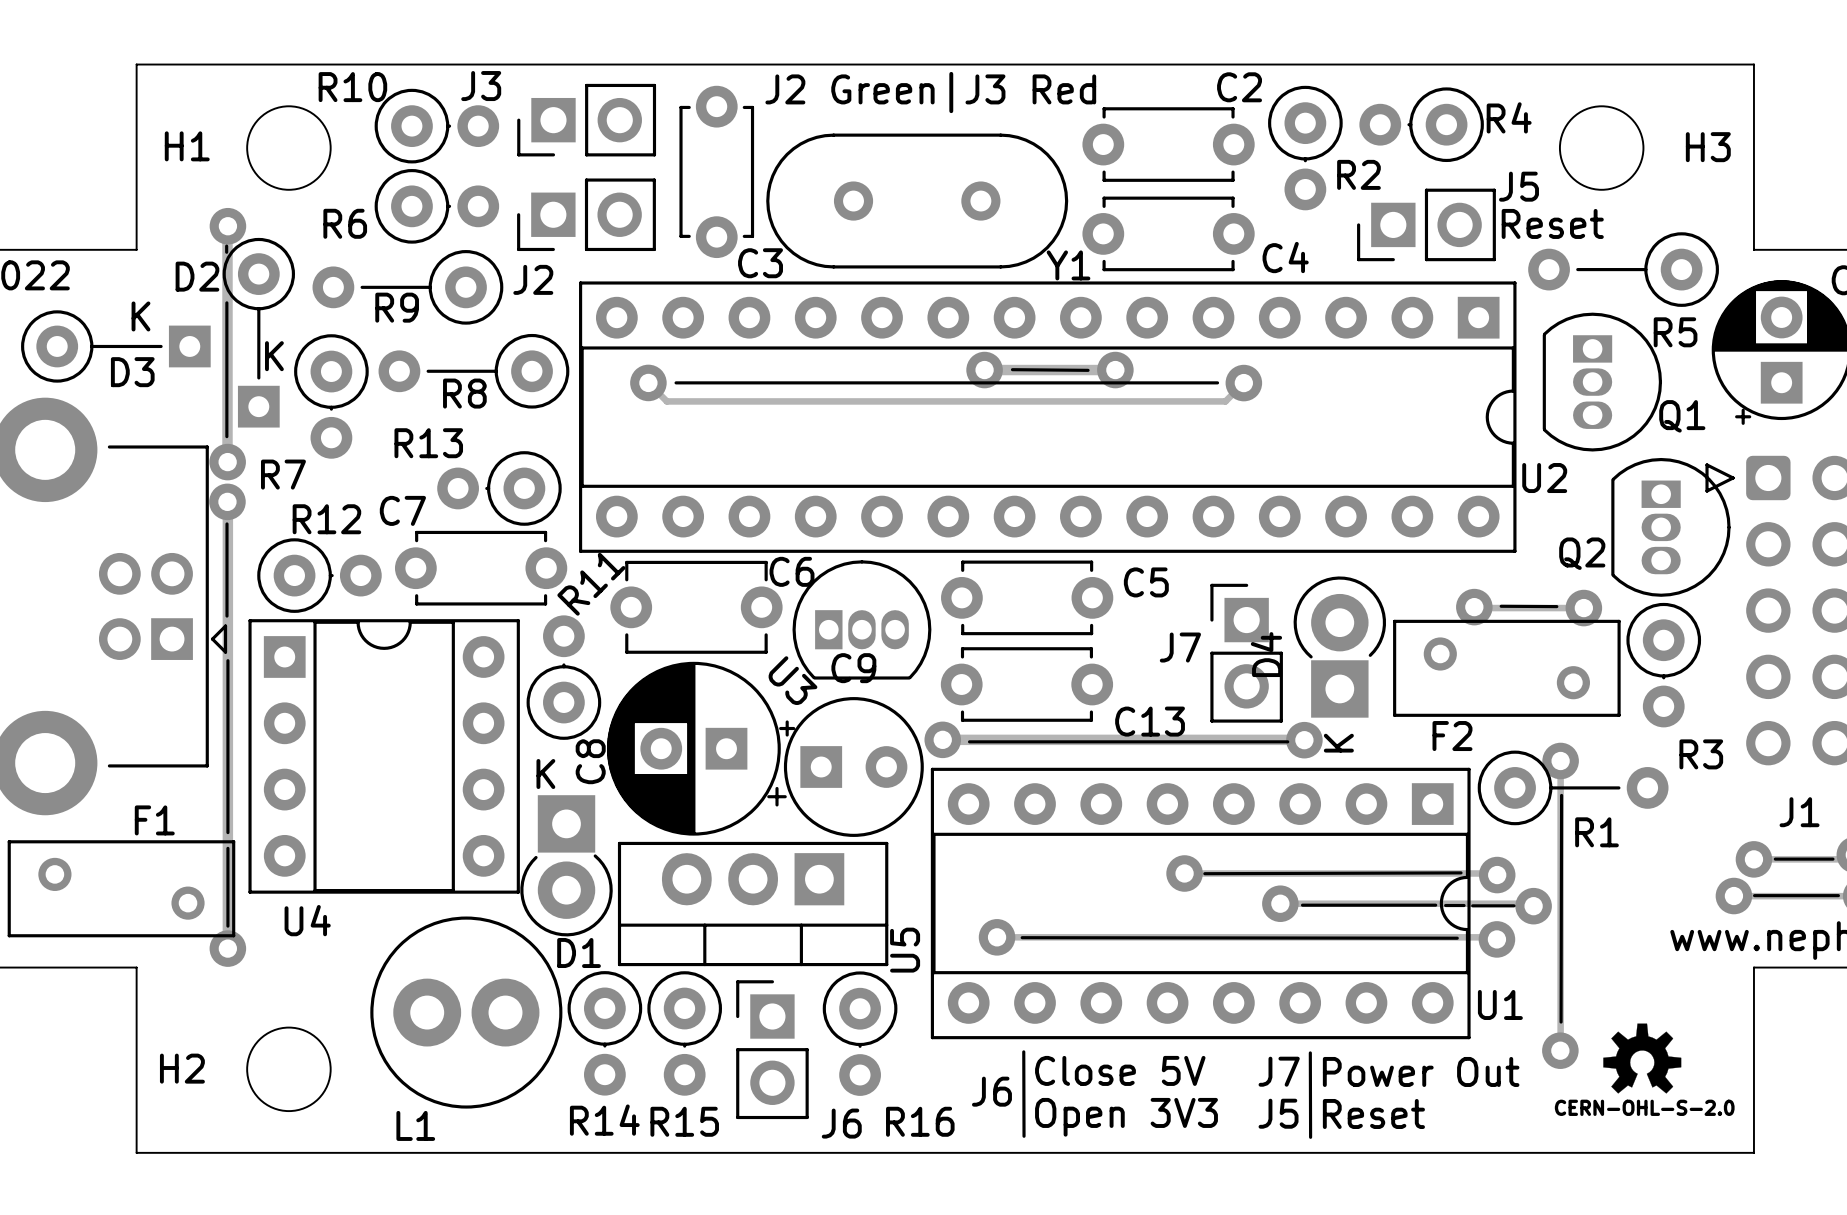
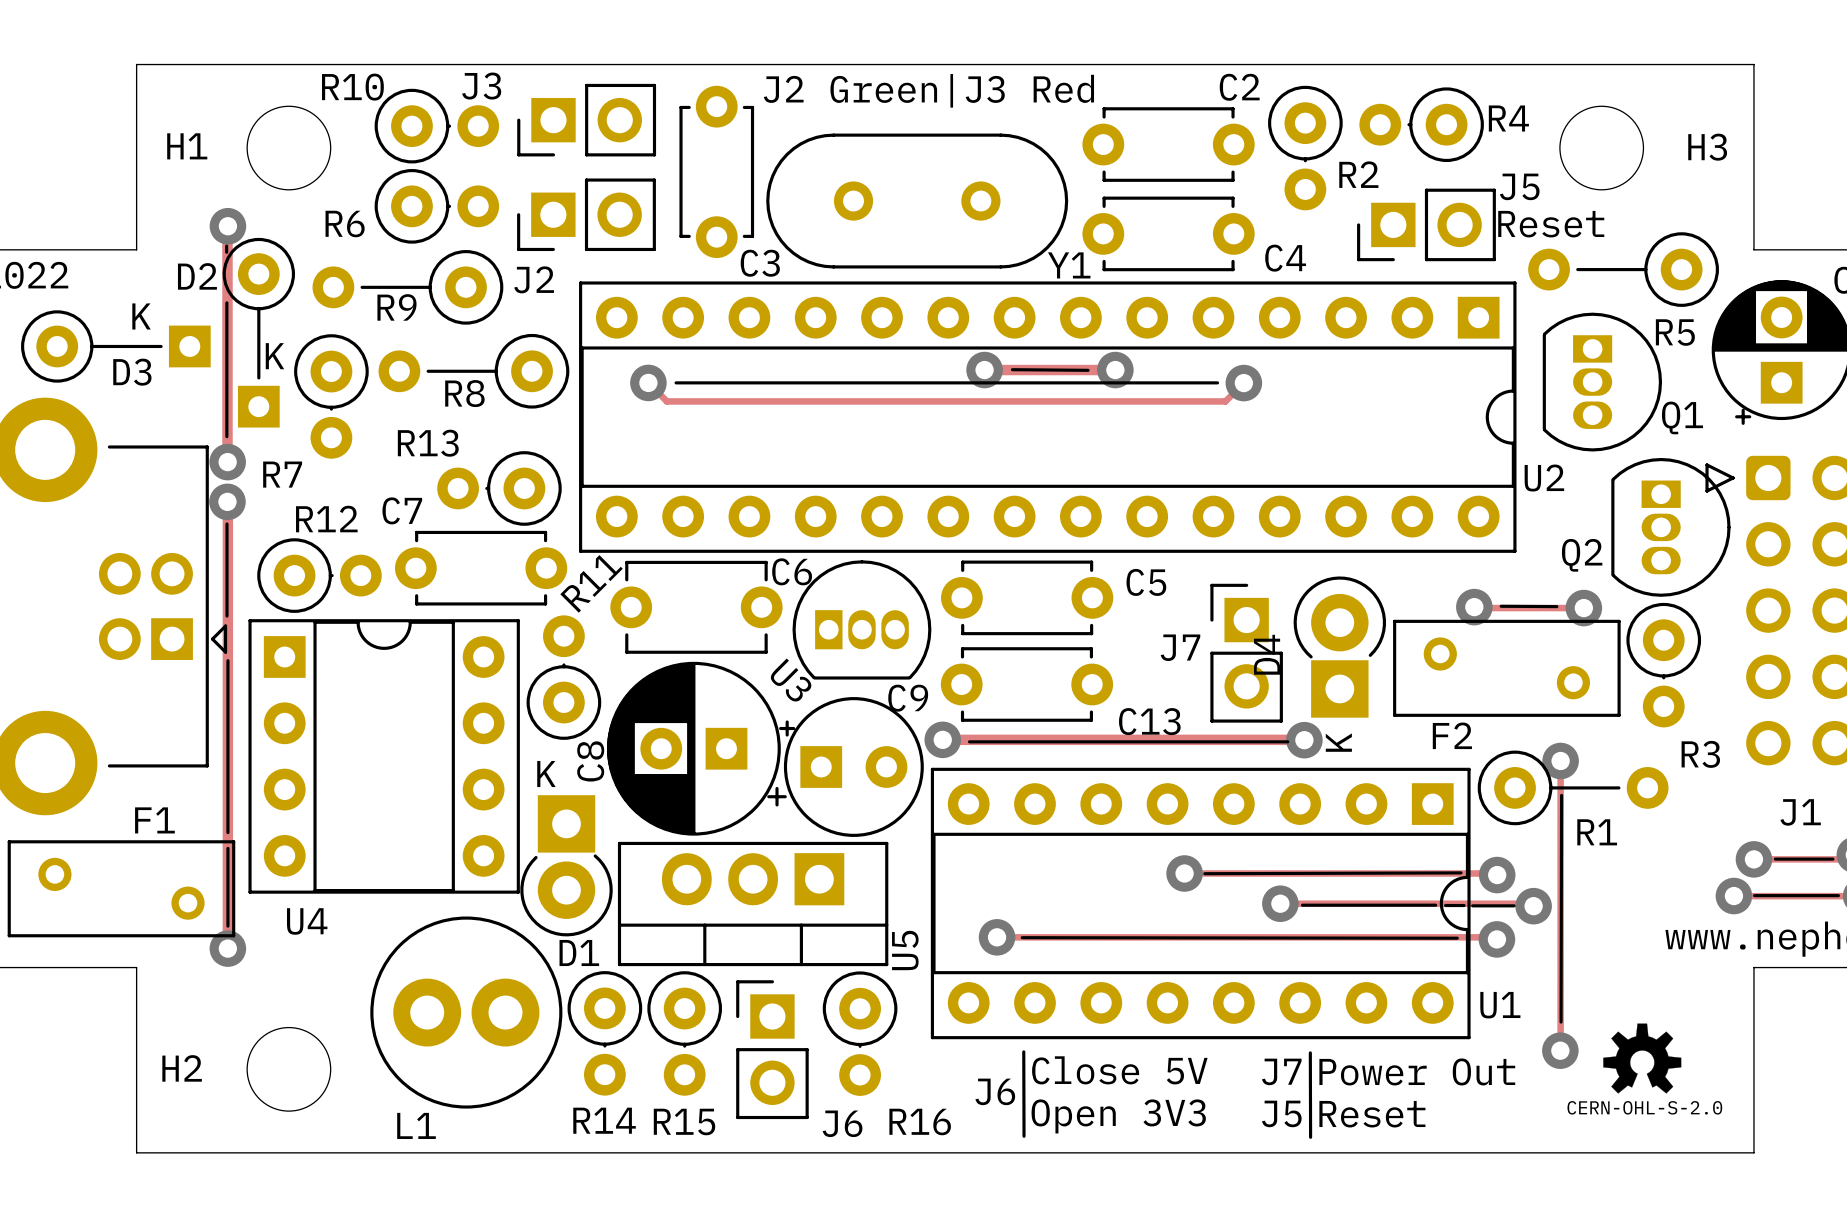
C9 name position: C9 (853, 668) -> C9 (908, 698)

